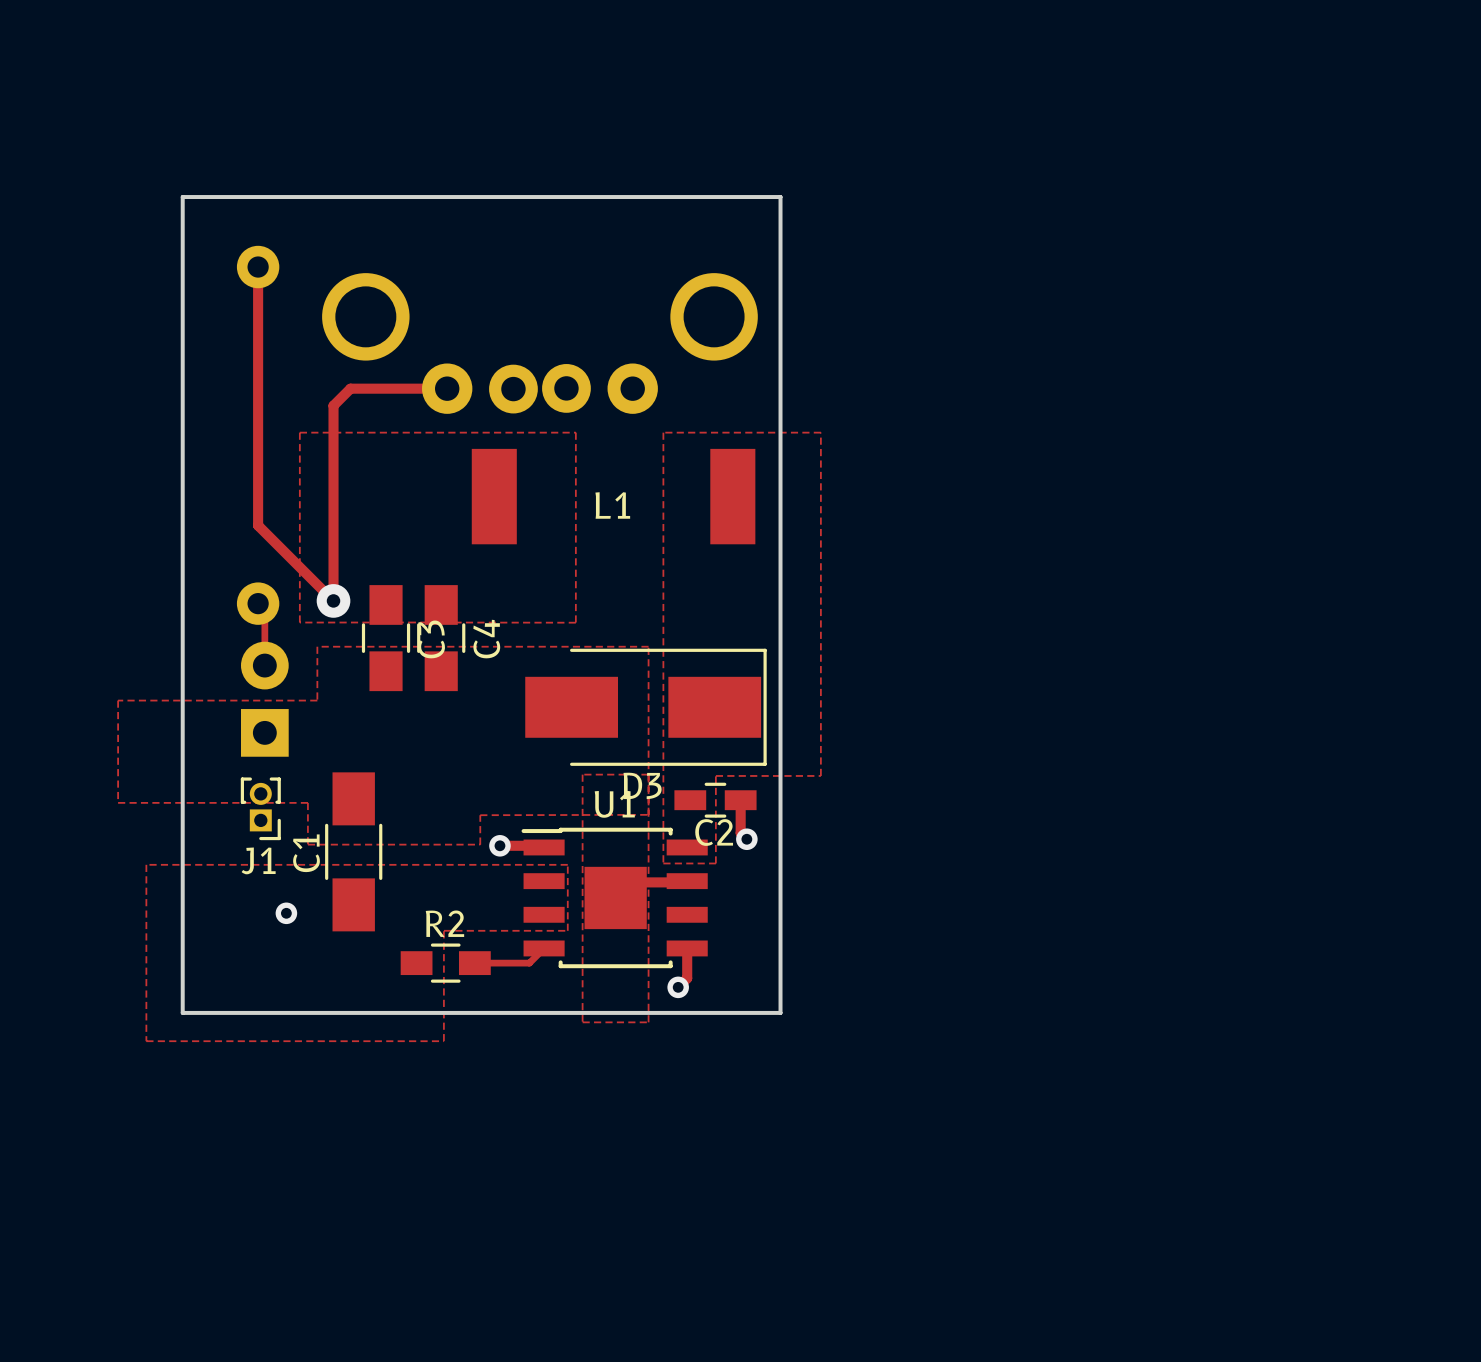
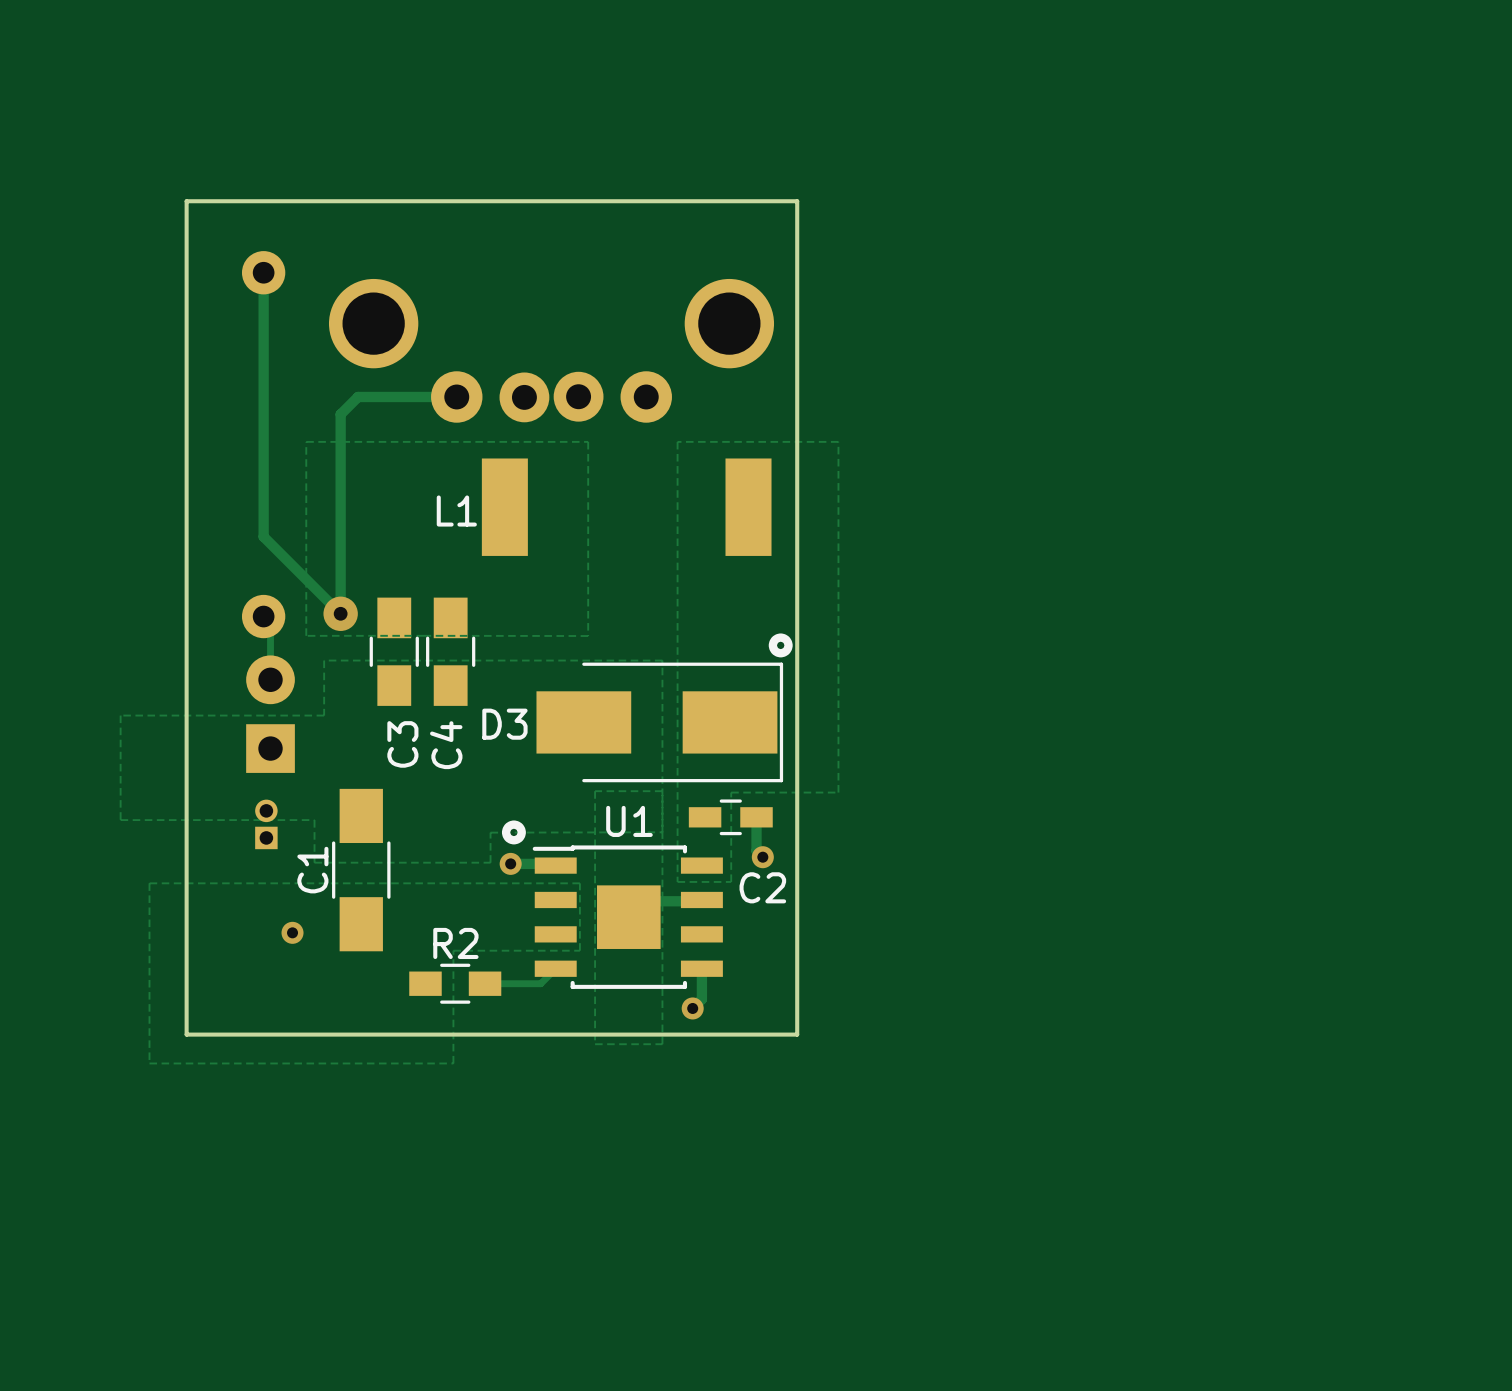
L1 name position: L1 (612, 505) -> L1 (456, 511)
drawing: none -> [768, 633, 793, 658]
C3 name position: C3 (431, 639) -> C3 (402, 744)
C4 name position: C4 (486, 639) -> C4 (446, 745)
D3 name position: D3 (642, 785) -> D3 (504, 724)
drawing: none -> [501, 820, 526, 845]
J1 side: top (260, 808) -> bottom (266, 824)
C2 name position: C2 (714, 832) -> C2 (762, 887)

